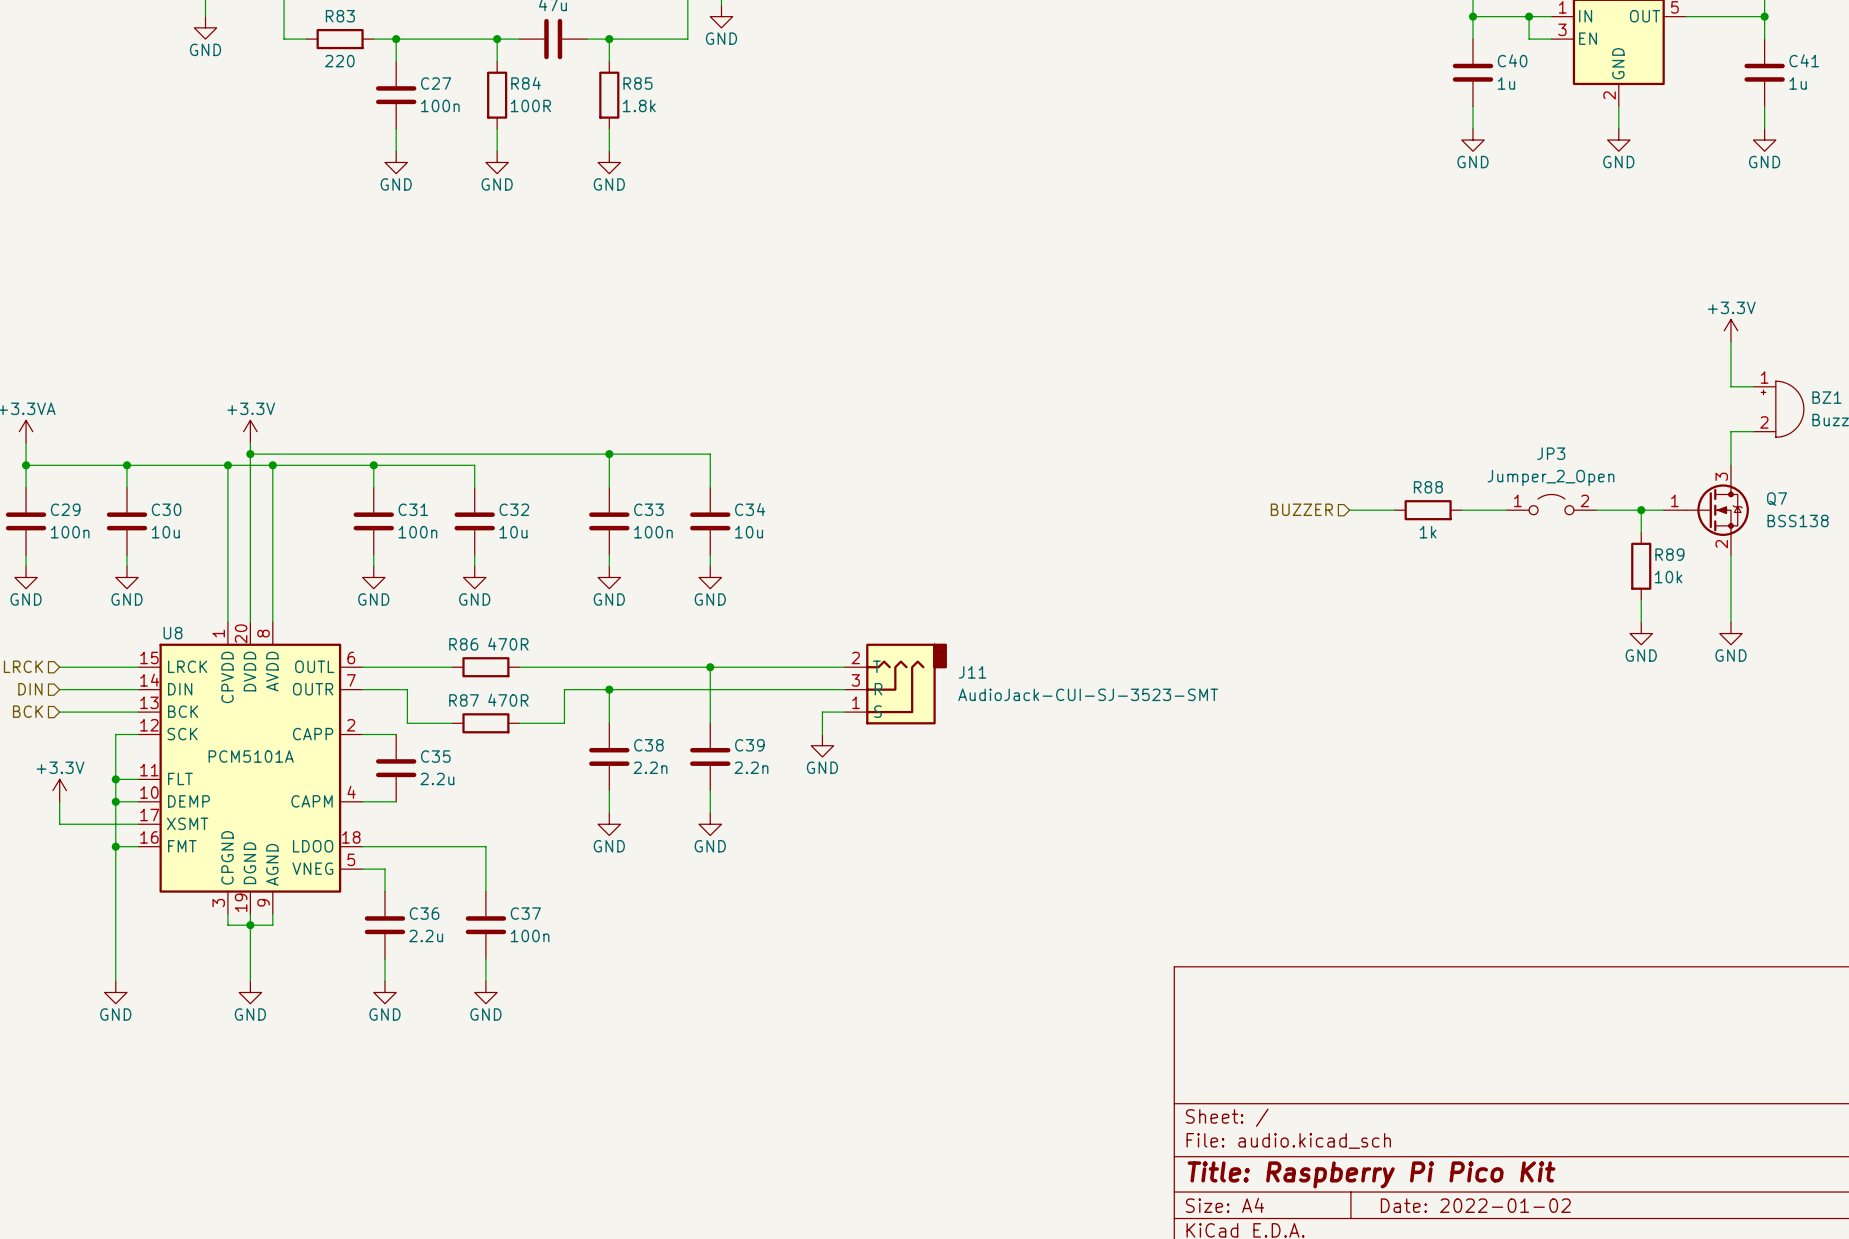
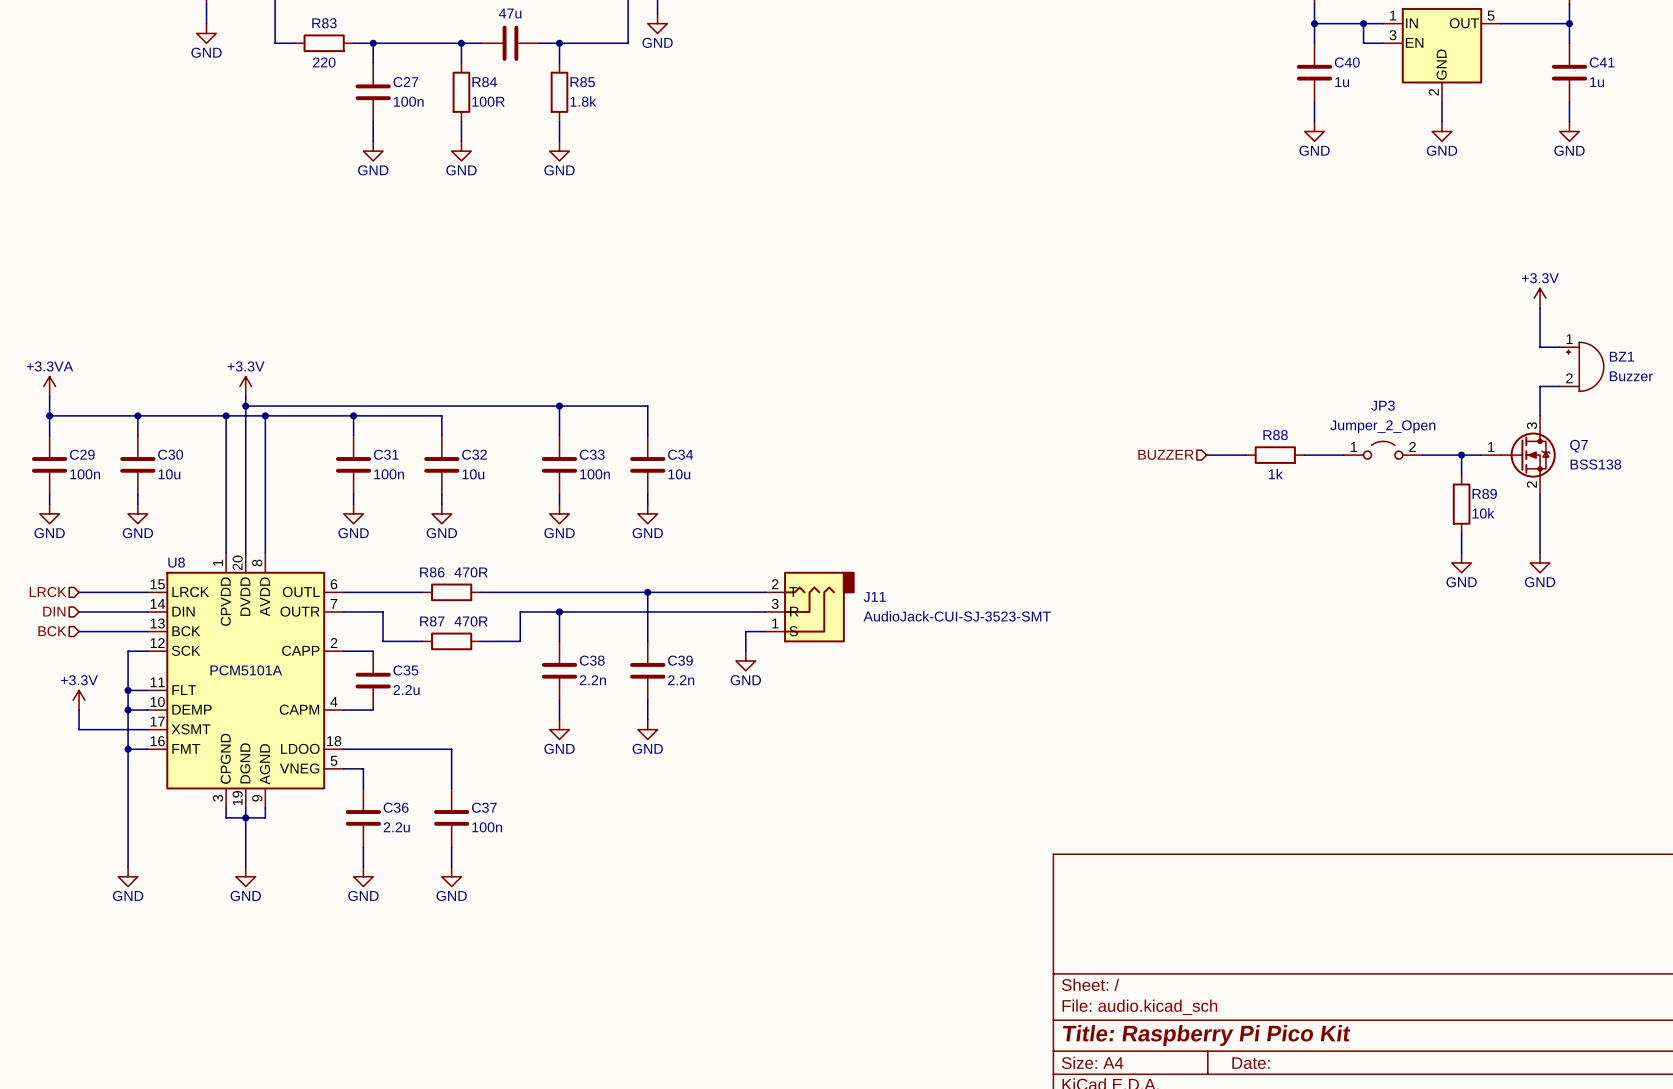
title block: Date: 2022-01-02 (1475, 1205) -> Date: (1251, 1063)

